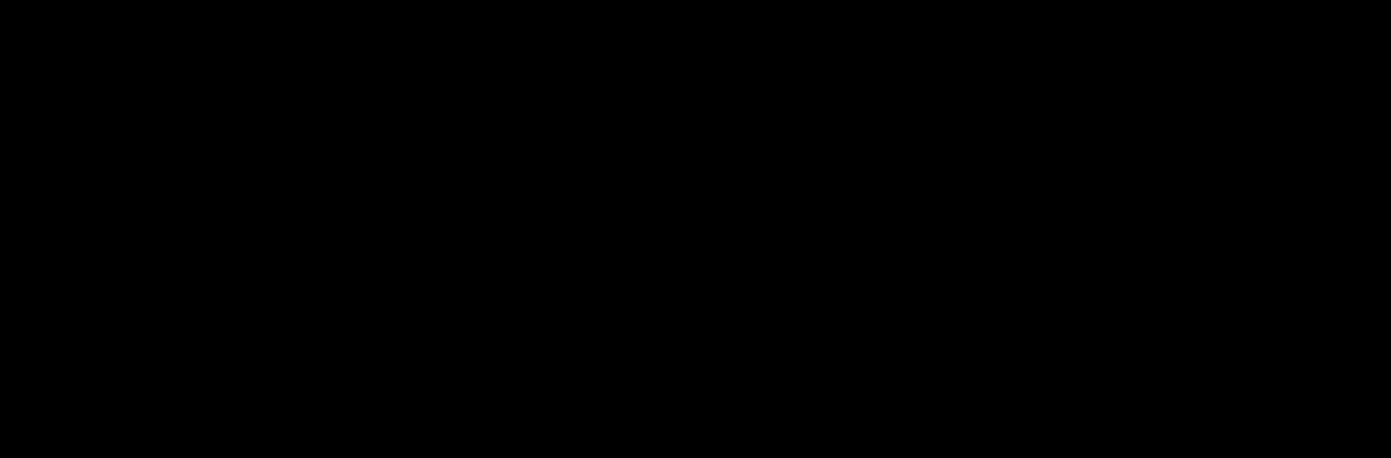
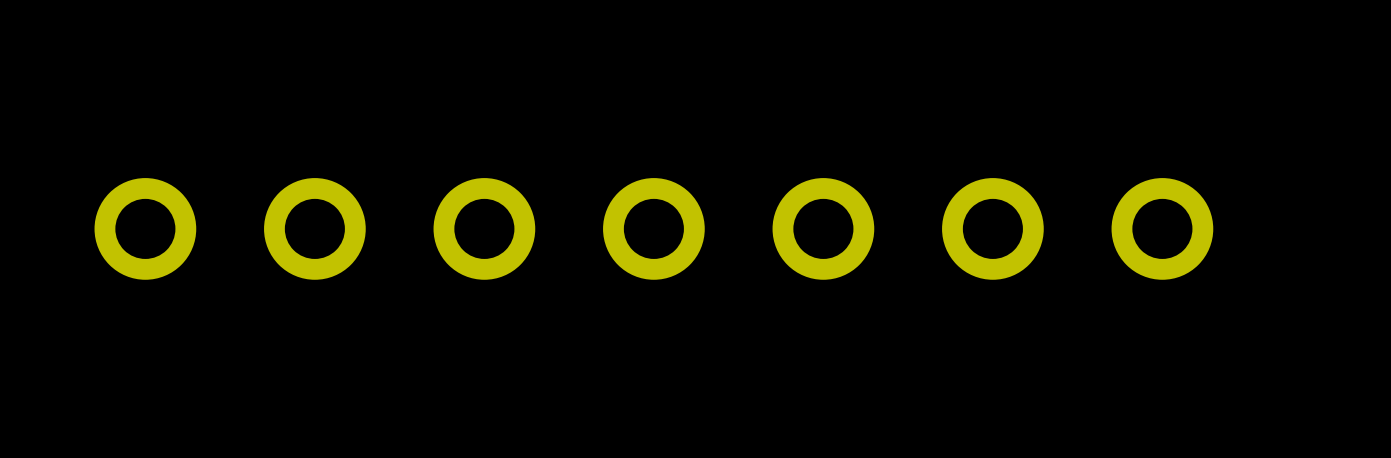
part: none -> (653, 228)

